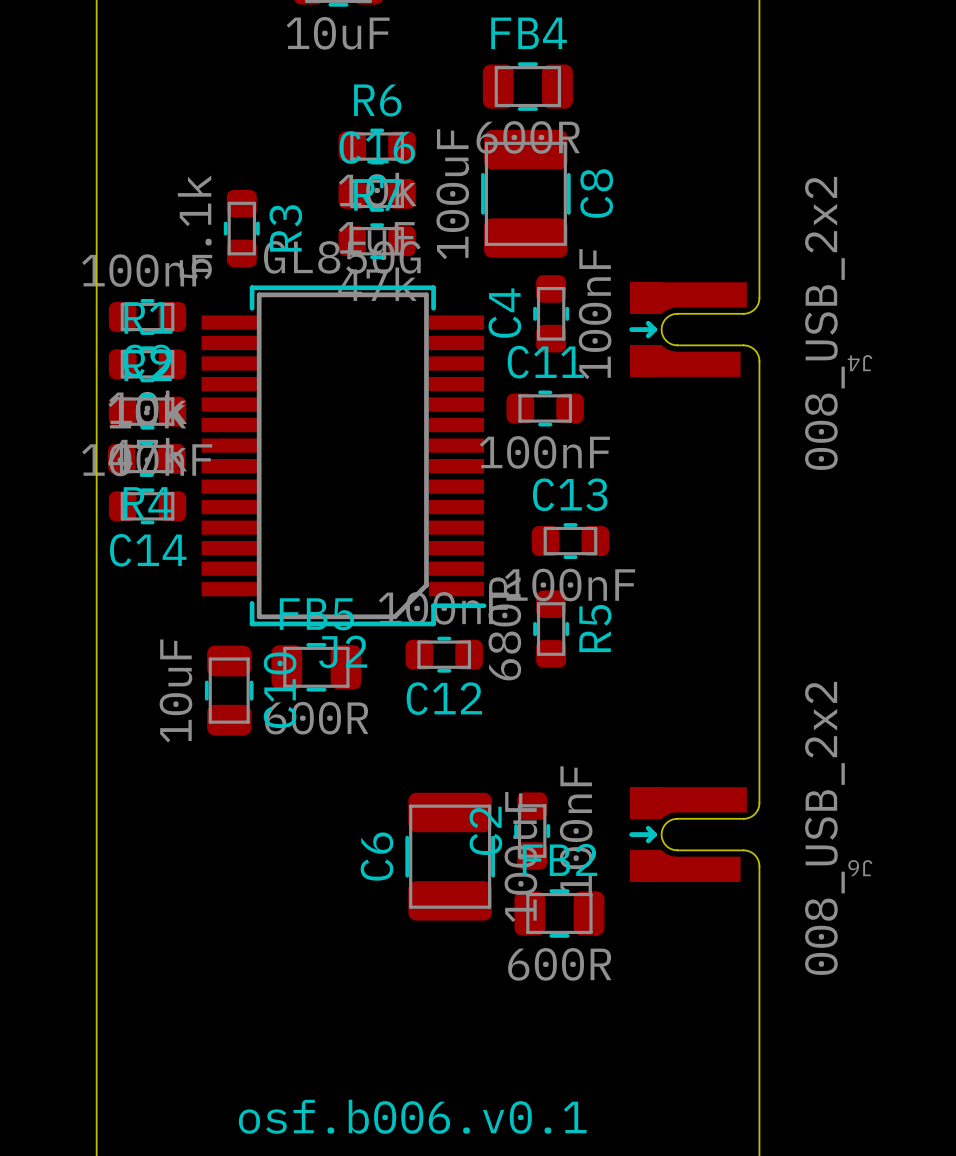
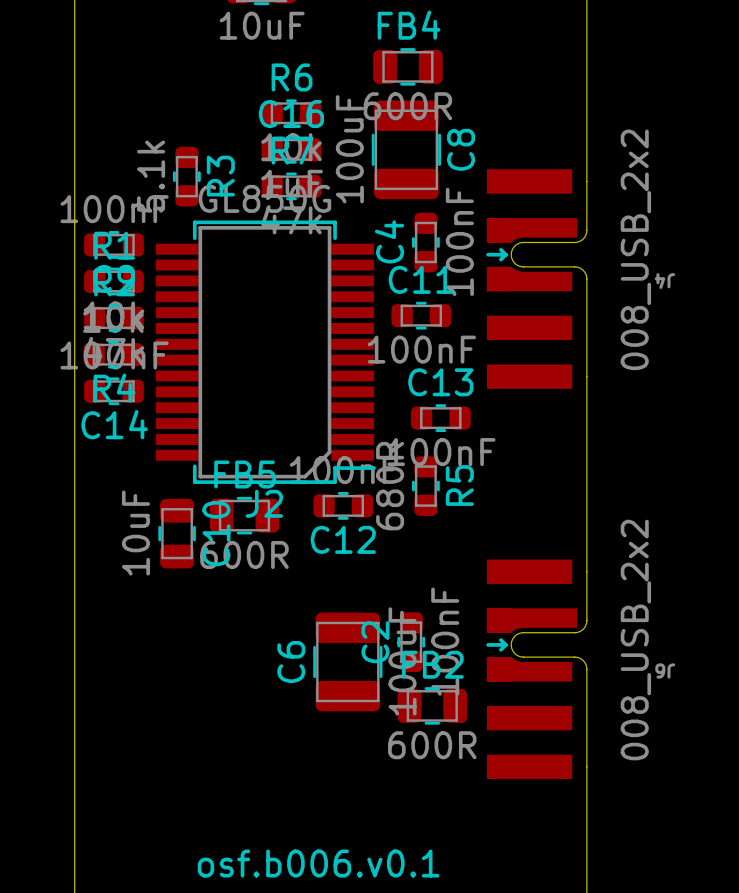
J4 footprint: [629, 282, 761, 377] -> [486, 169, 588, 389]
J6 footprint: [629, 787, 761, 882] -> [486, 559, 588, 780]

